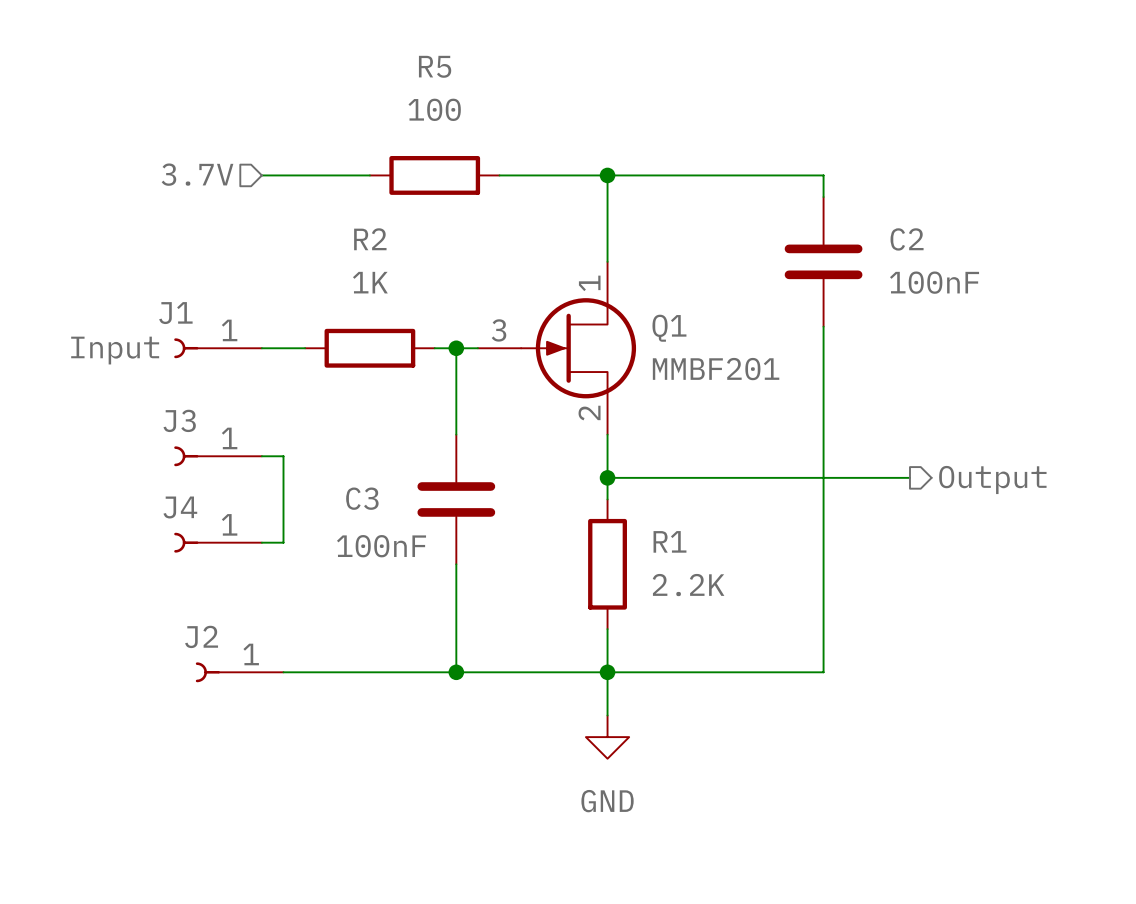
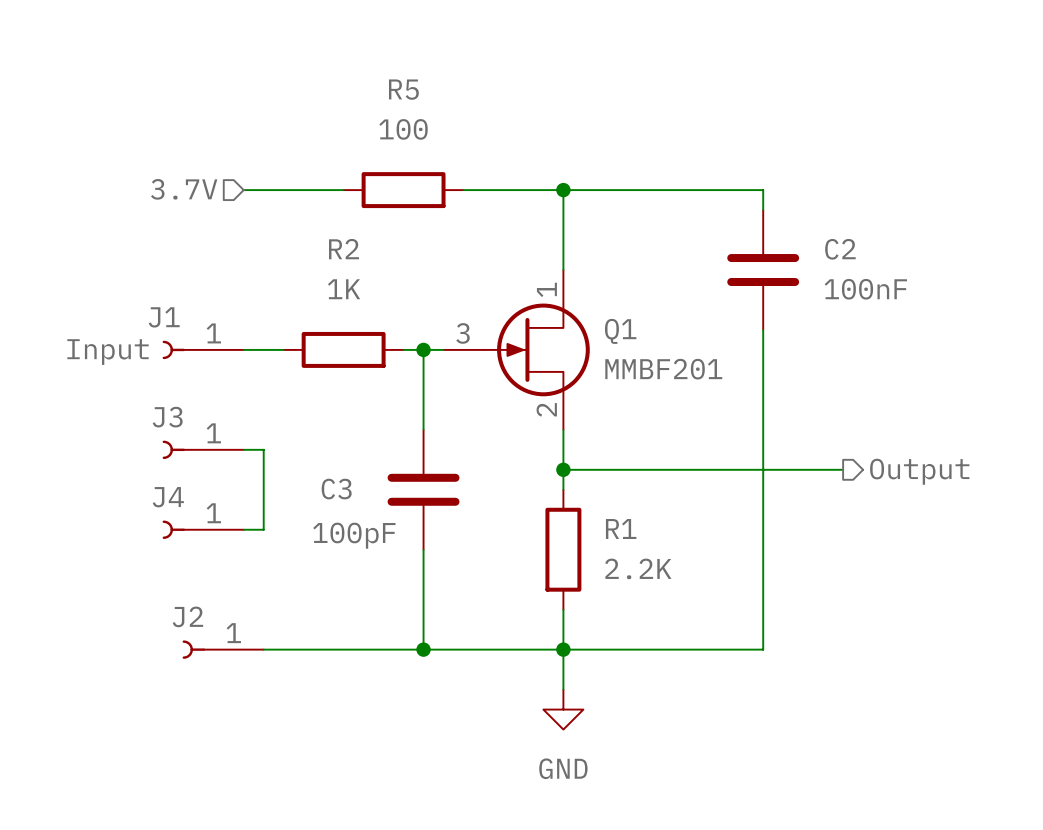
C3 value: 100nF (381, 546) -> 100pF (354, 535)

